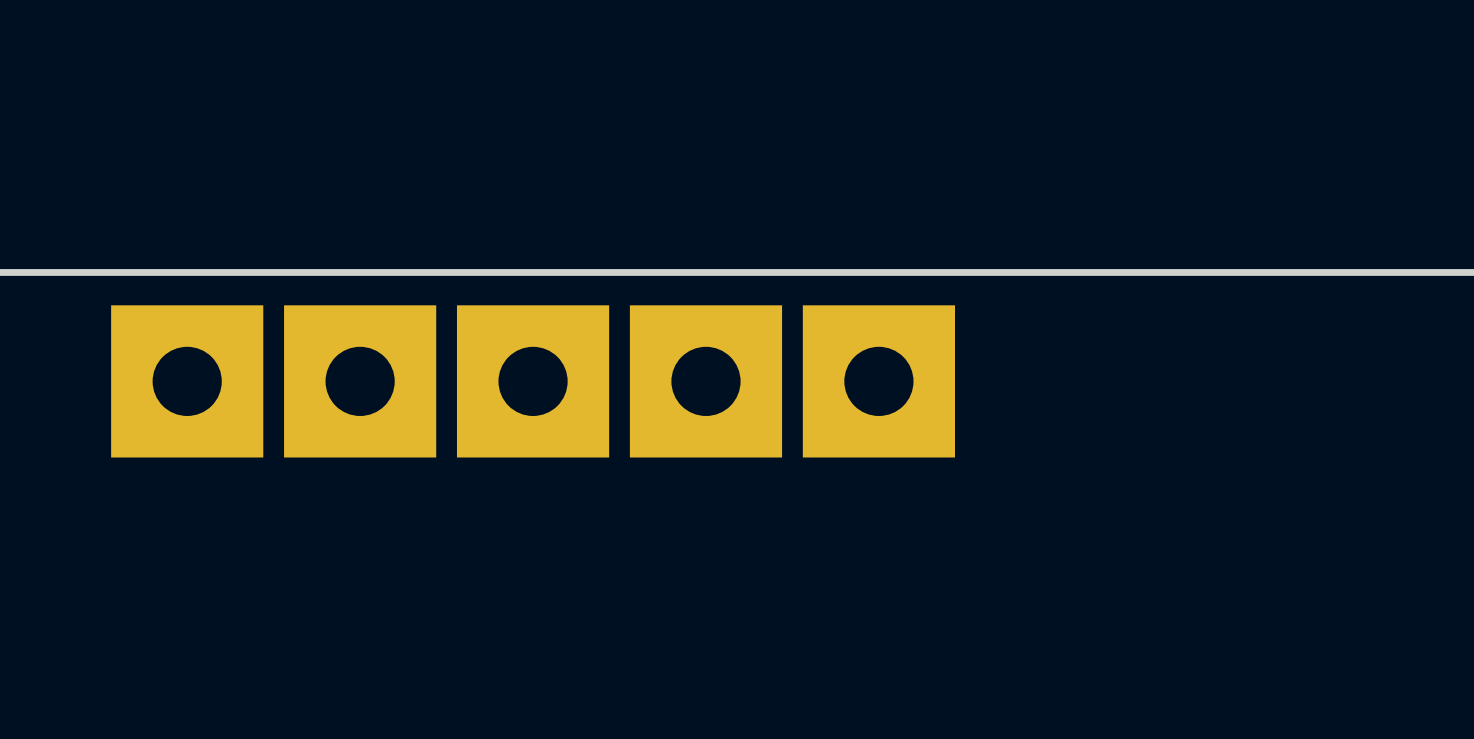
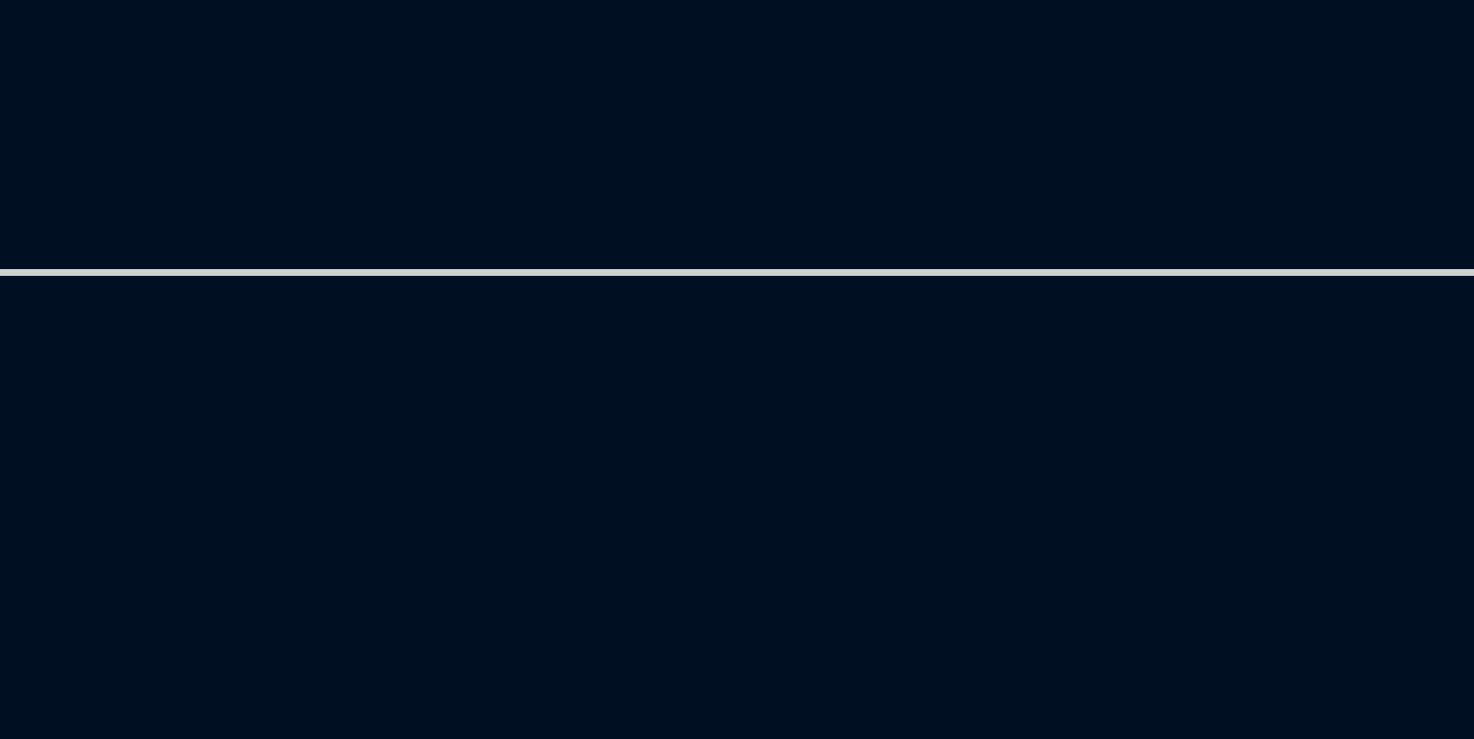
part: (187, 381) -> none
part: (360, 381) -> none
part: (533, 381) -> none
part: (705, 381) -> none
part: (878, 381) -> none

